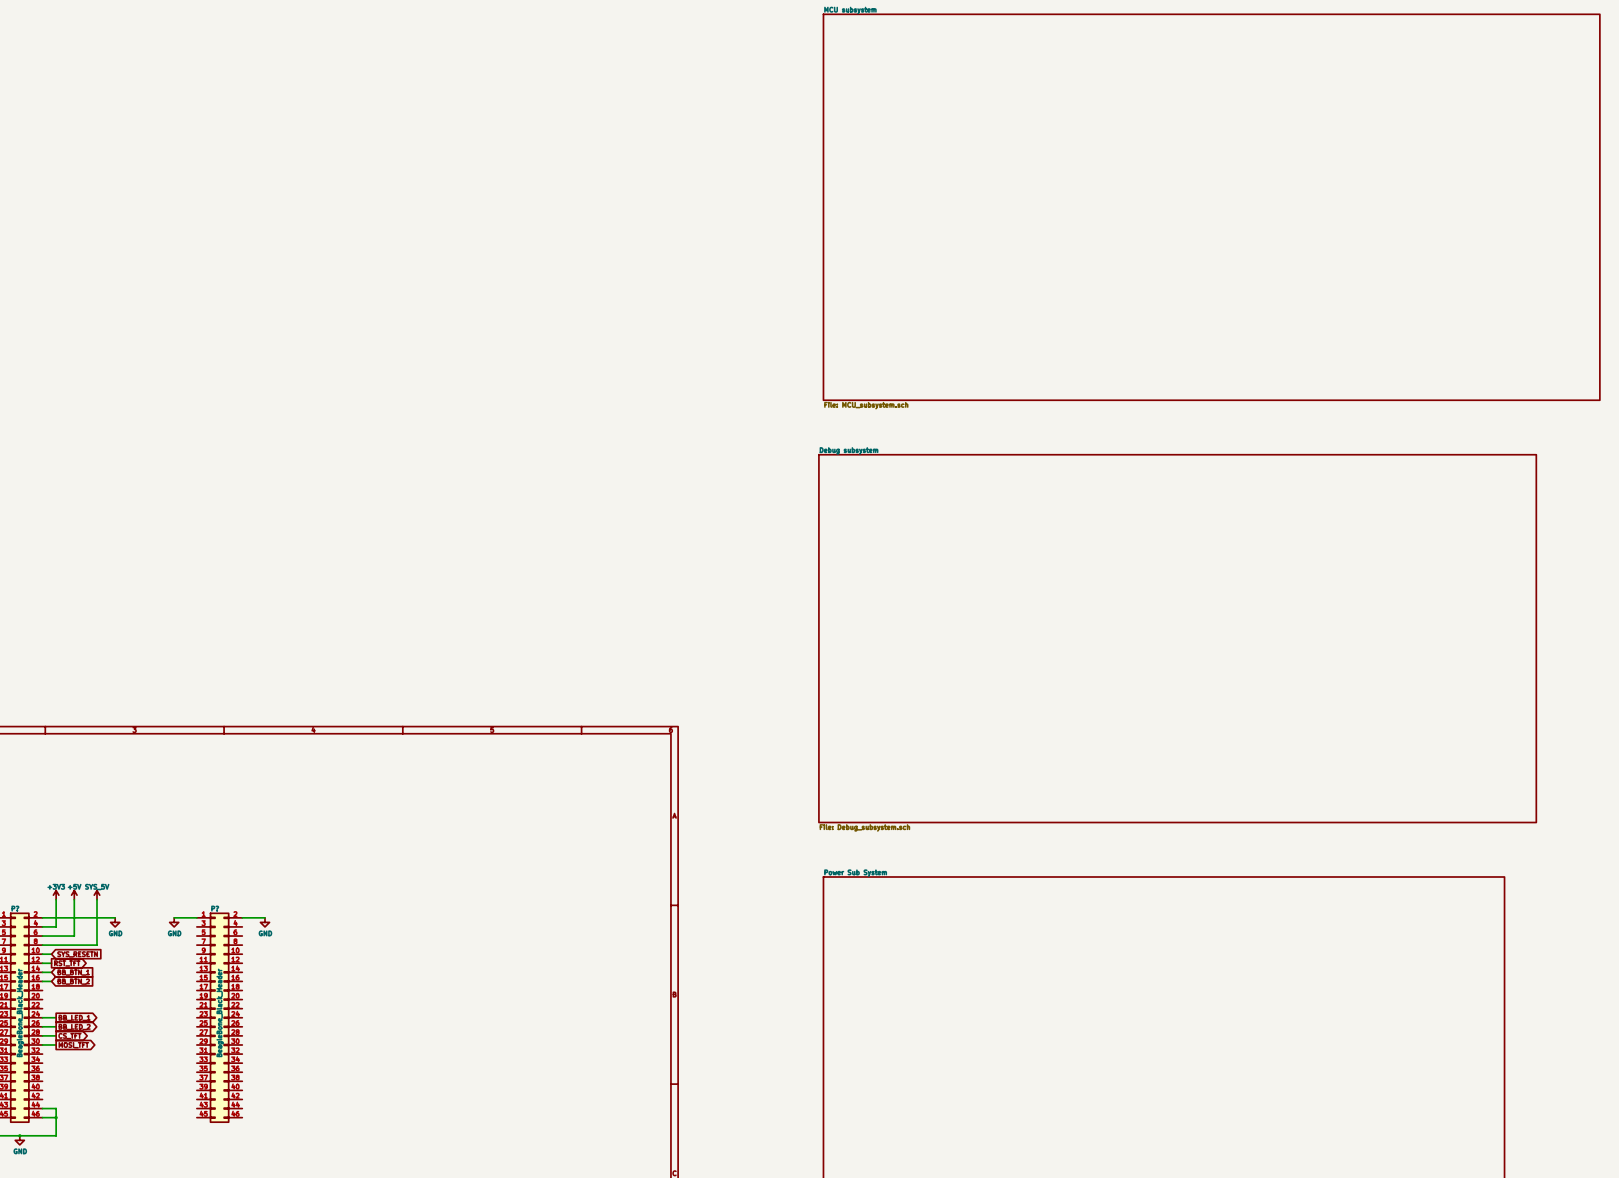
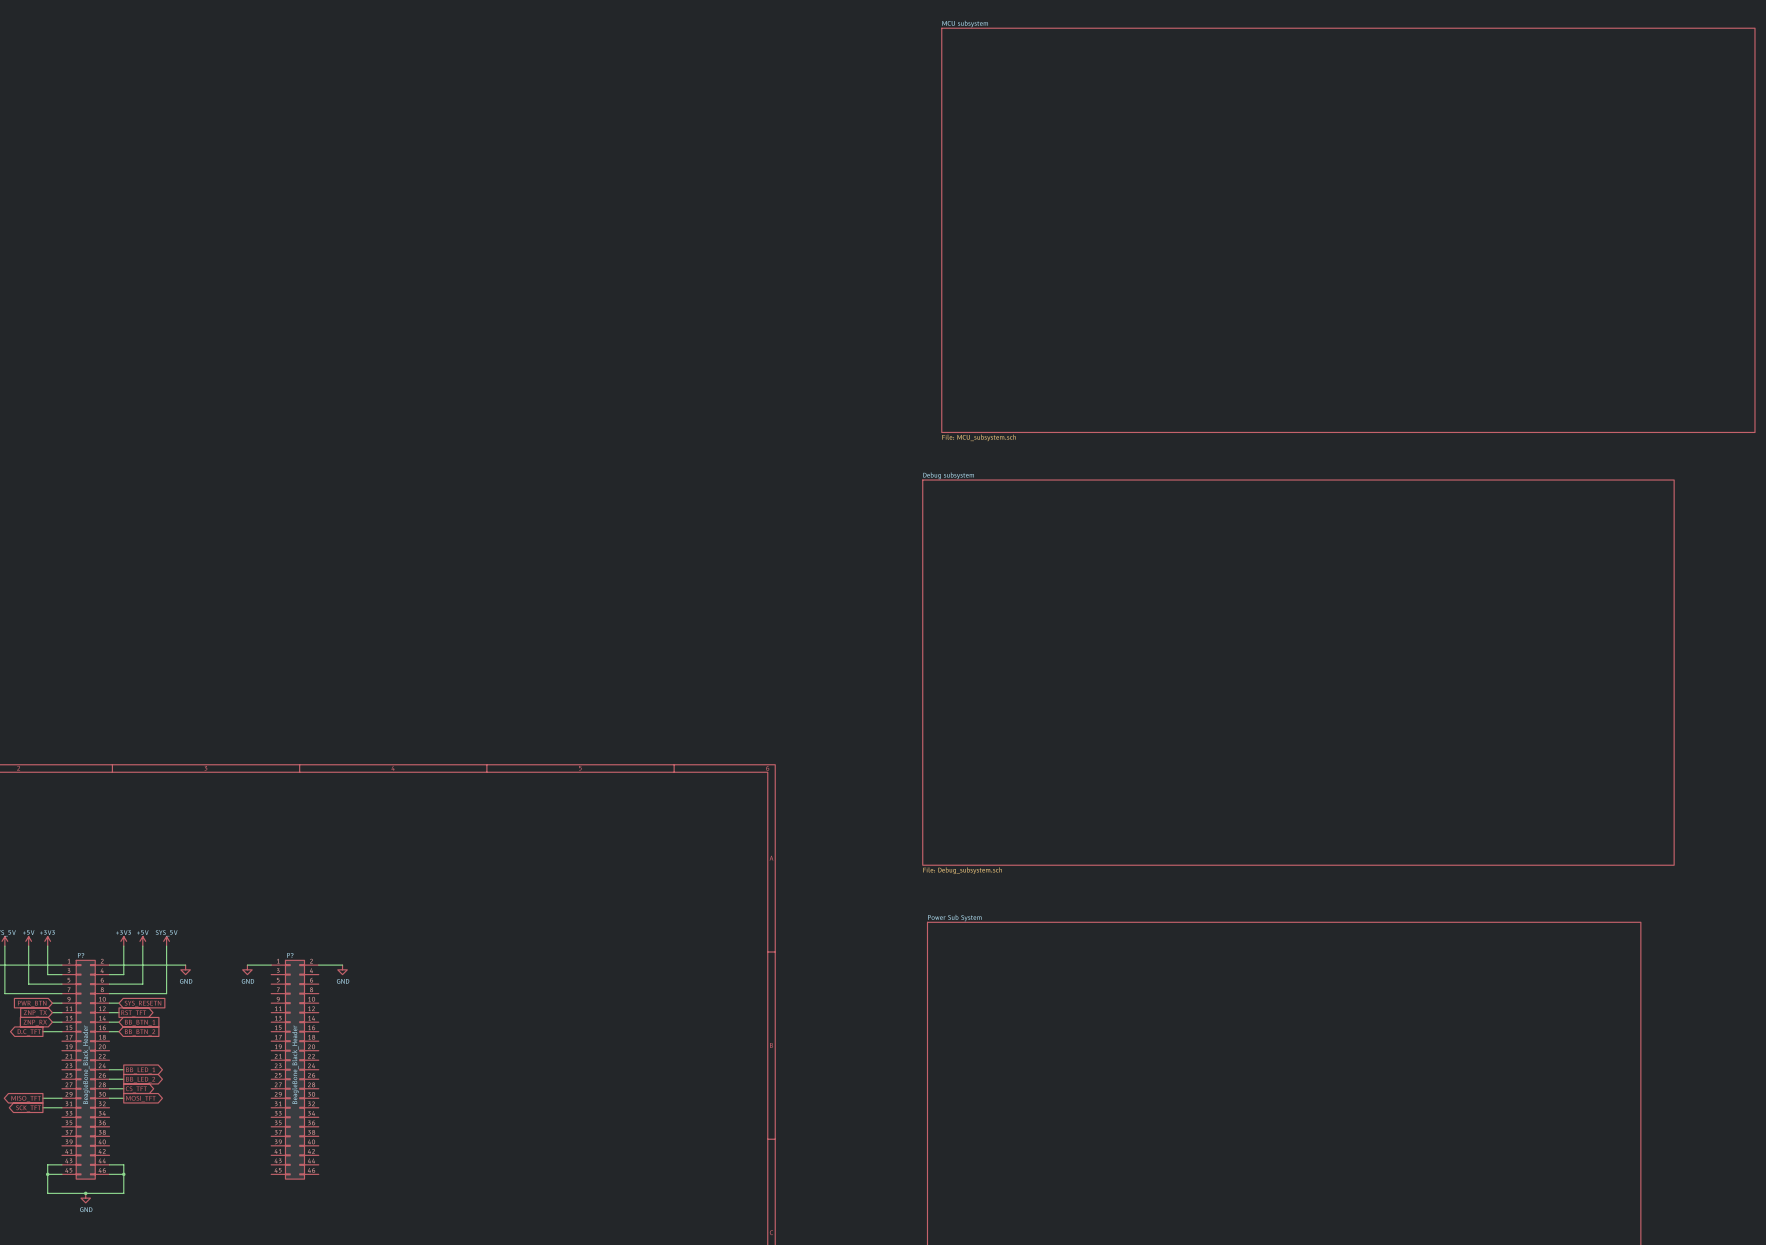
sheet position: (1211, 207) -> (1348, 230)

